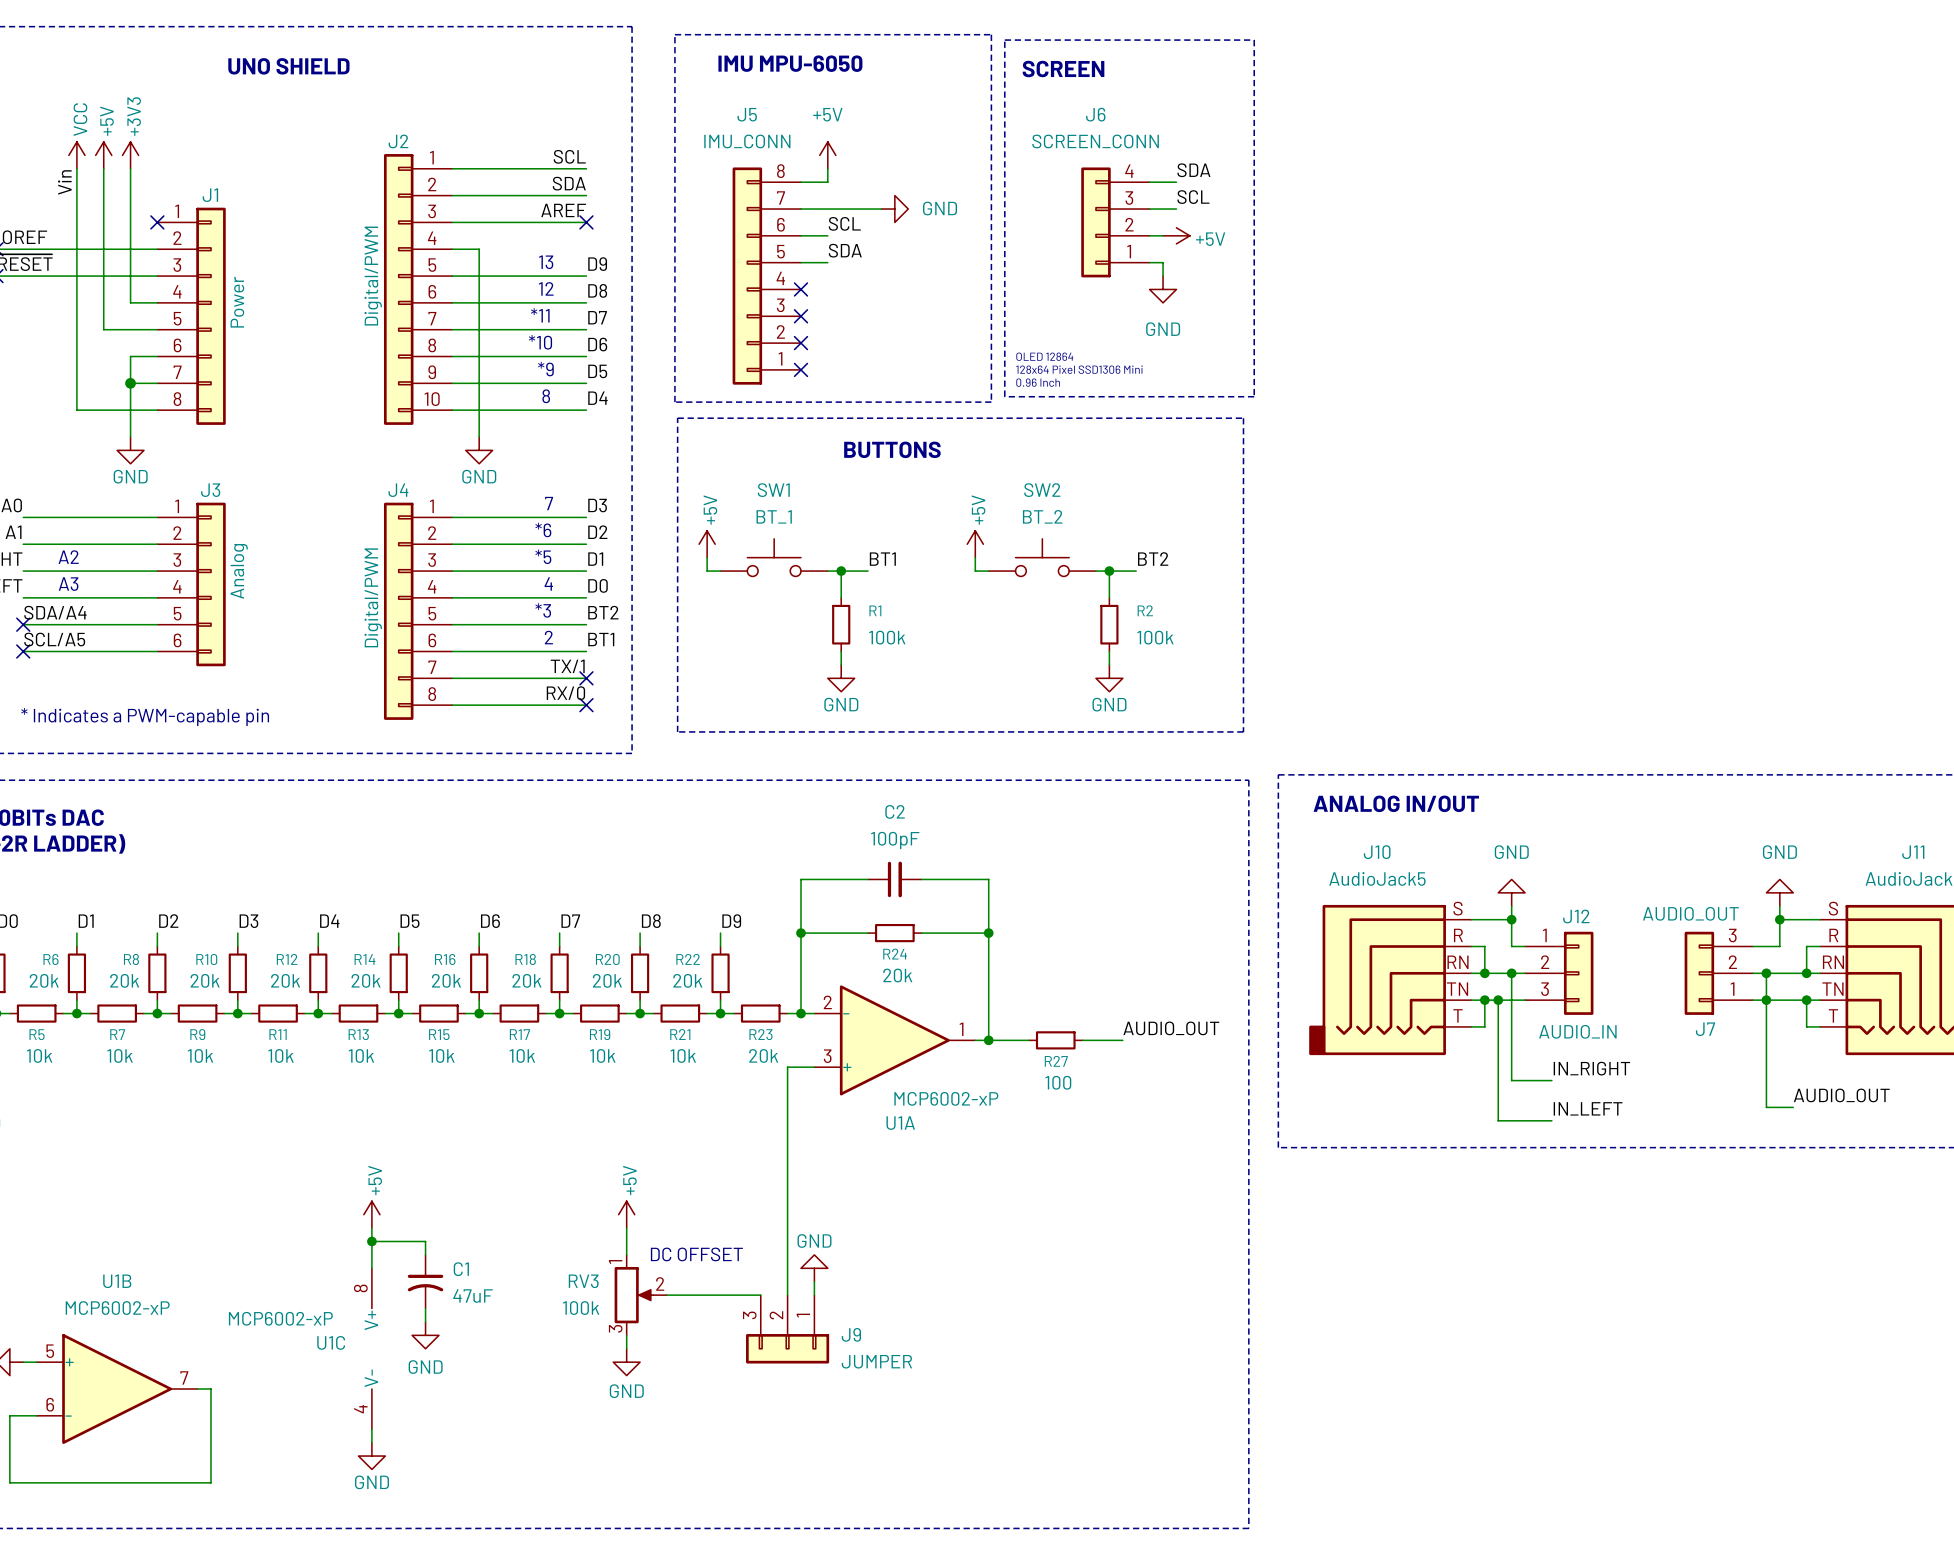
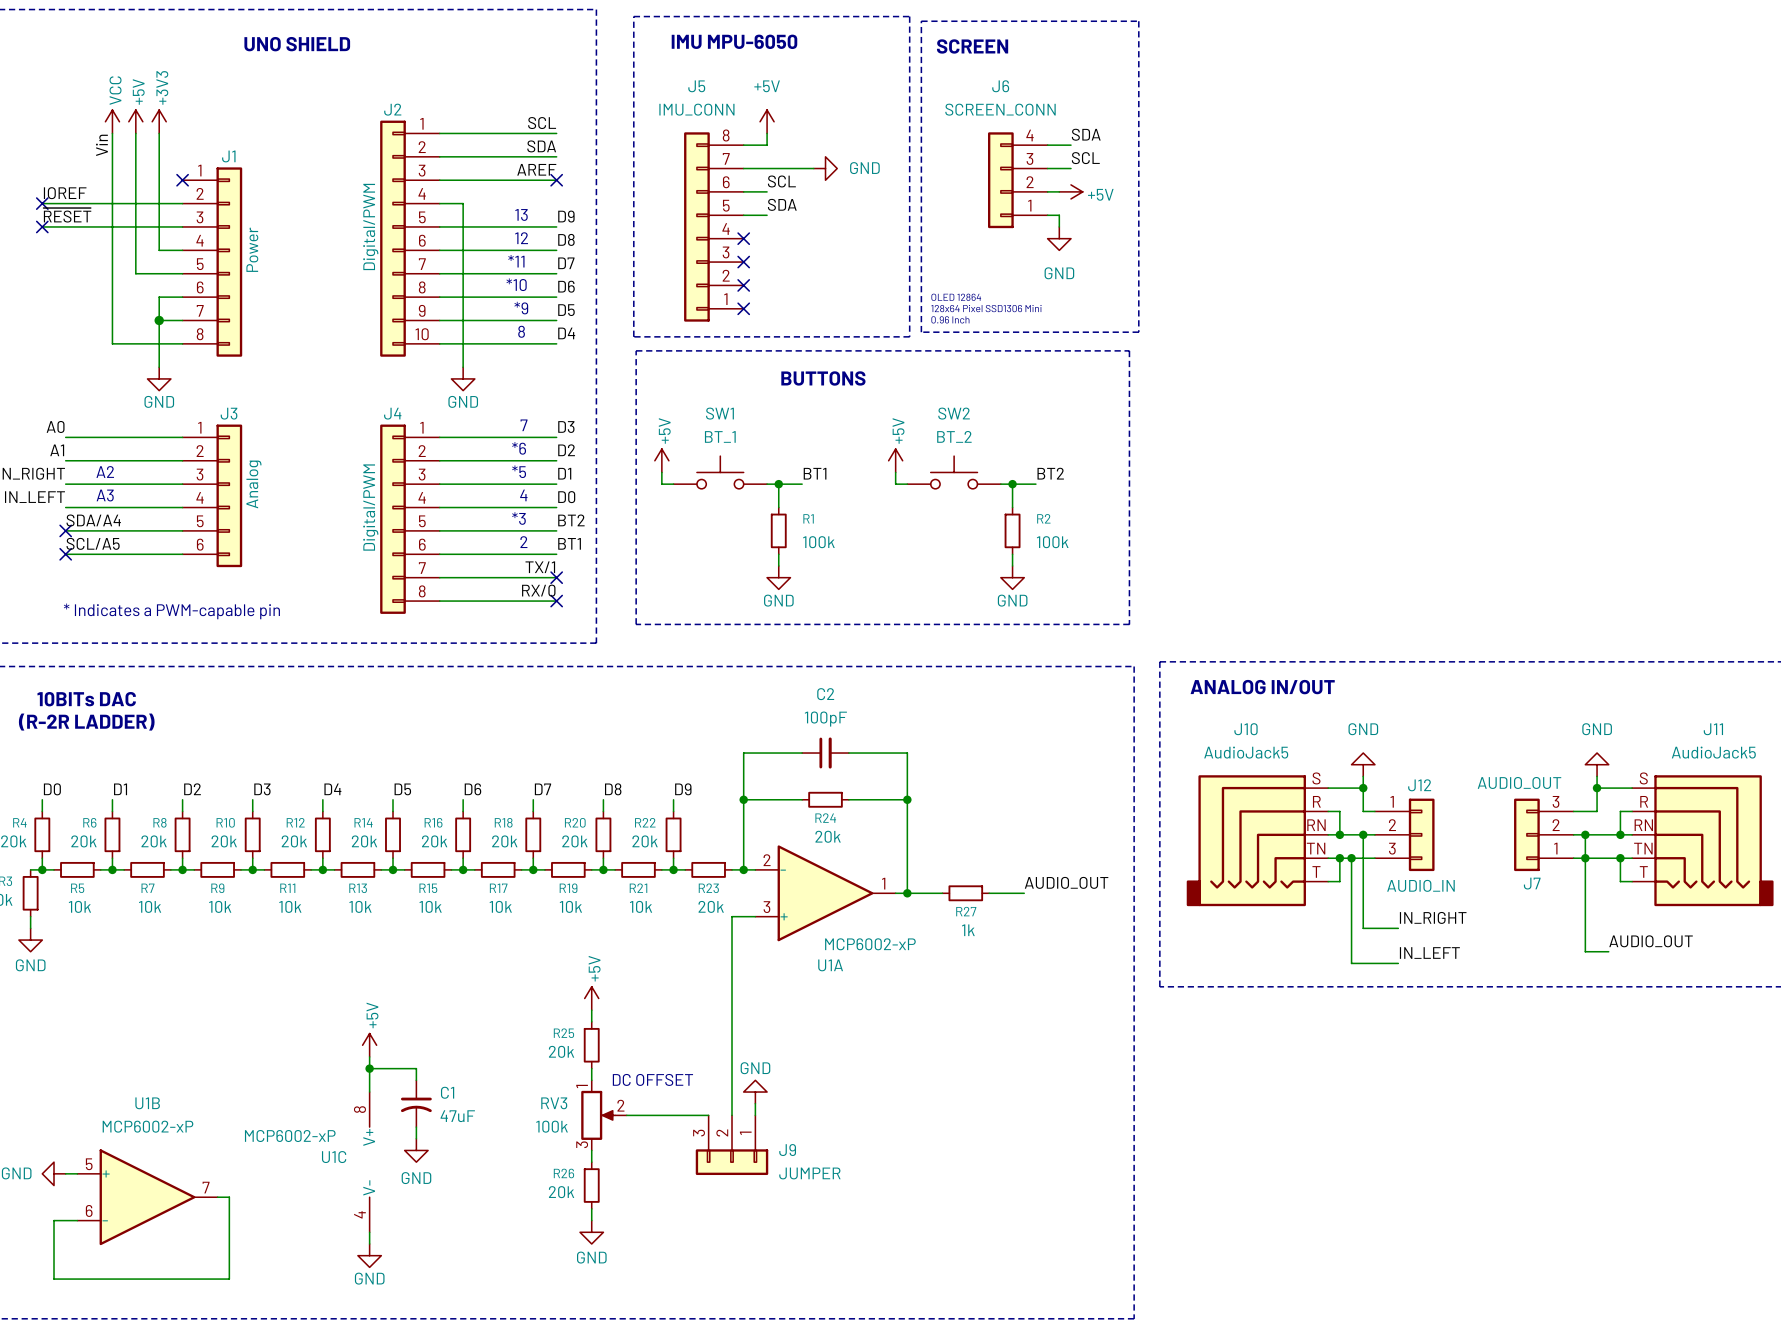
R27 value: 100 (1058, 1082) -> 1k (968, 930)
R25: none -> 20k (591, 1045)
power symbol position: +5V (626, 1214) -> +5V (591, 998)
power symbol position: GND (626, 1362) -> GND (591, 1232)
R26: none -> 20k (591, 1185)
wire: none -> (591, 1208) (591, 1220)

